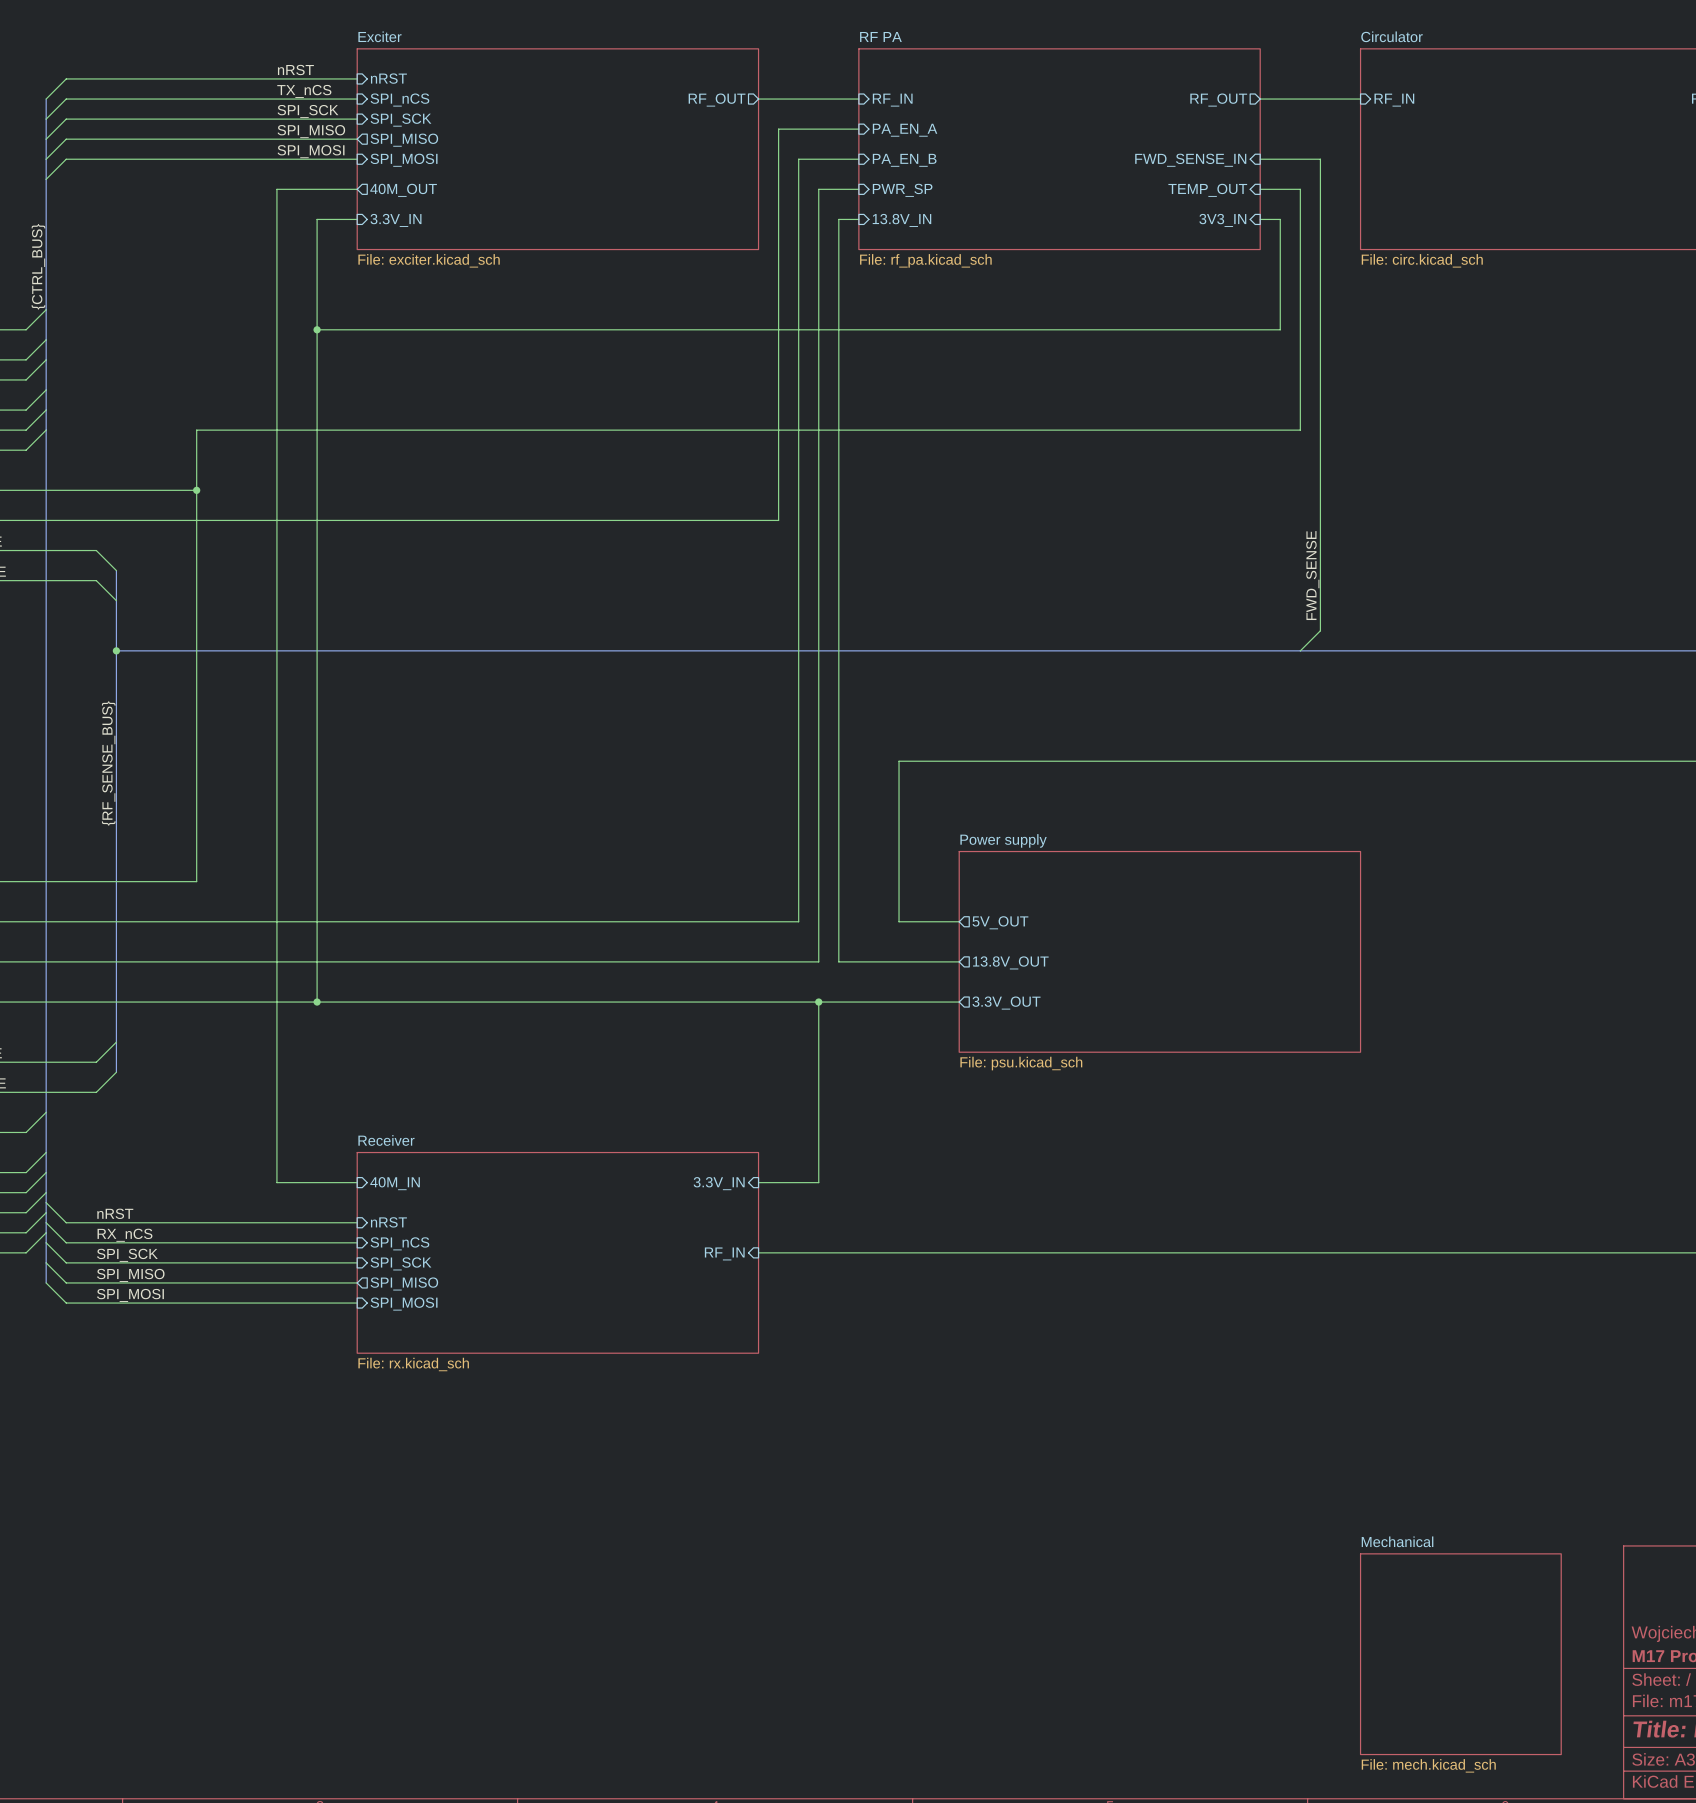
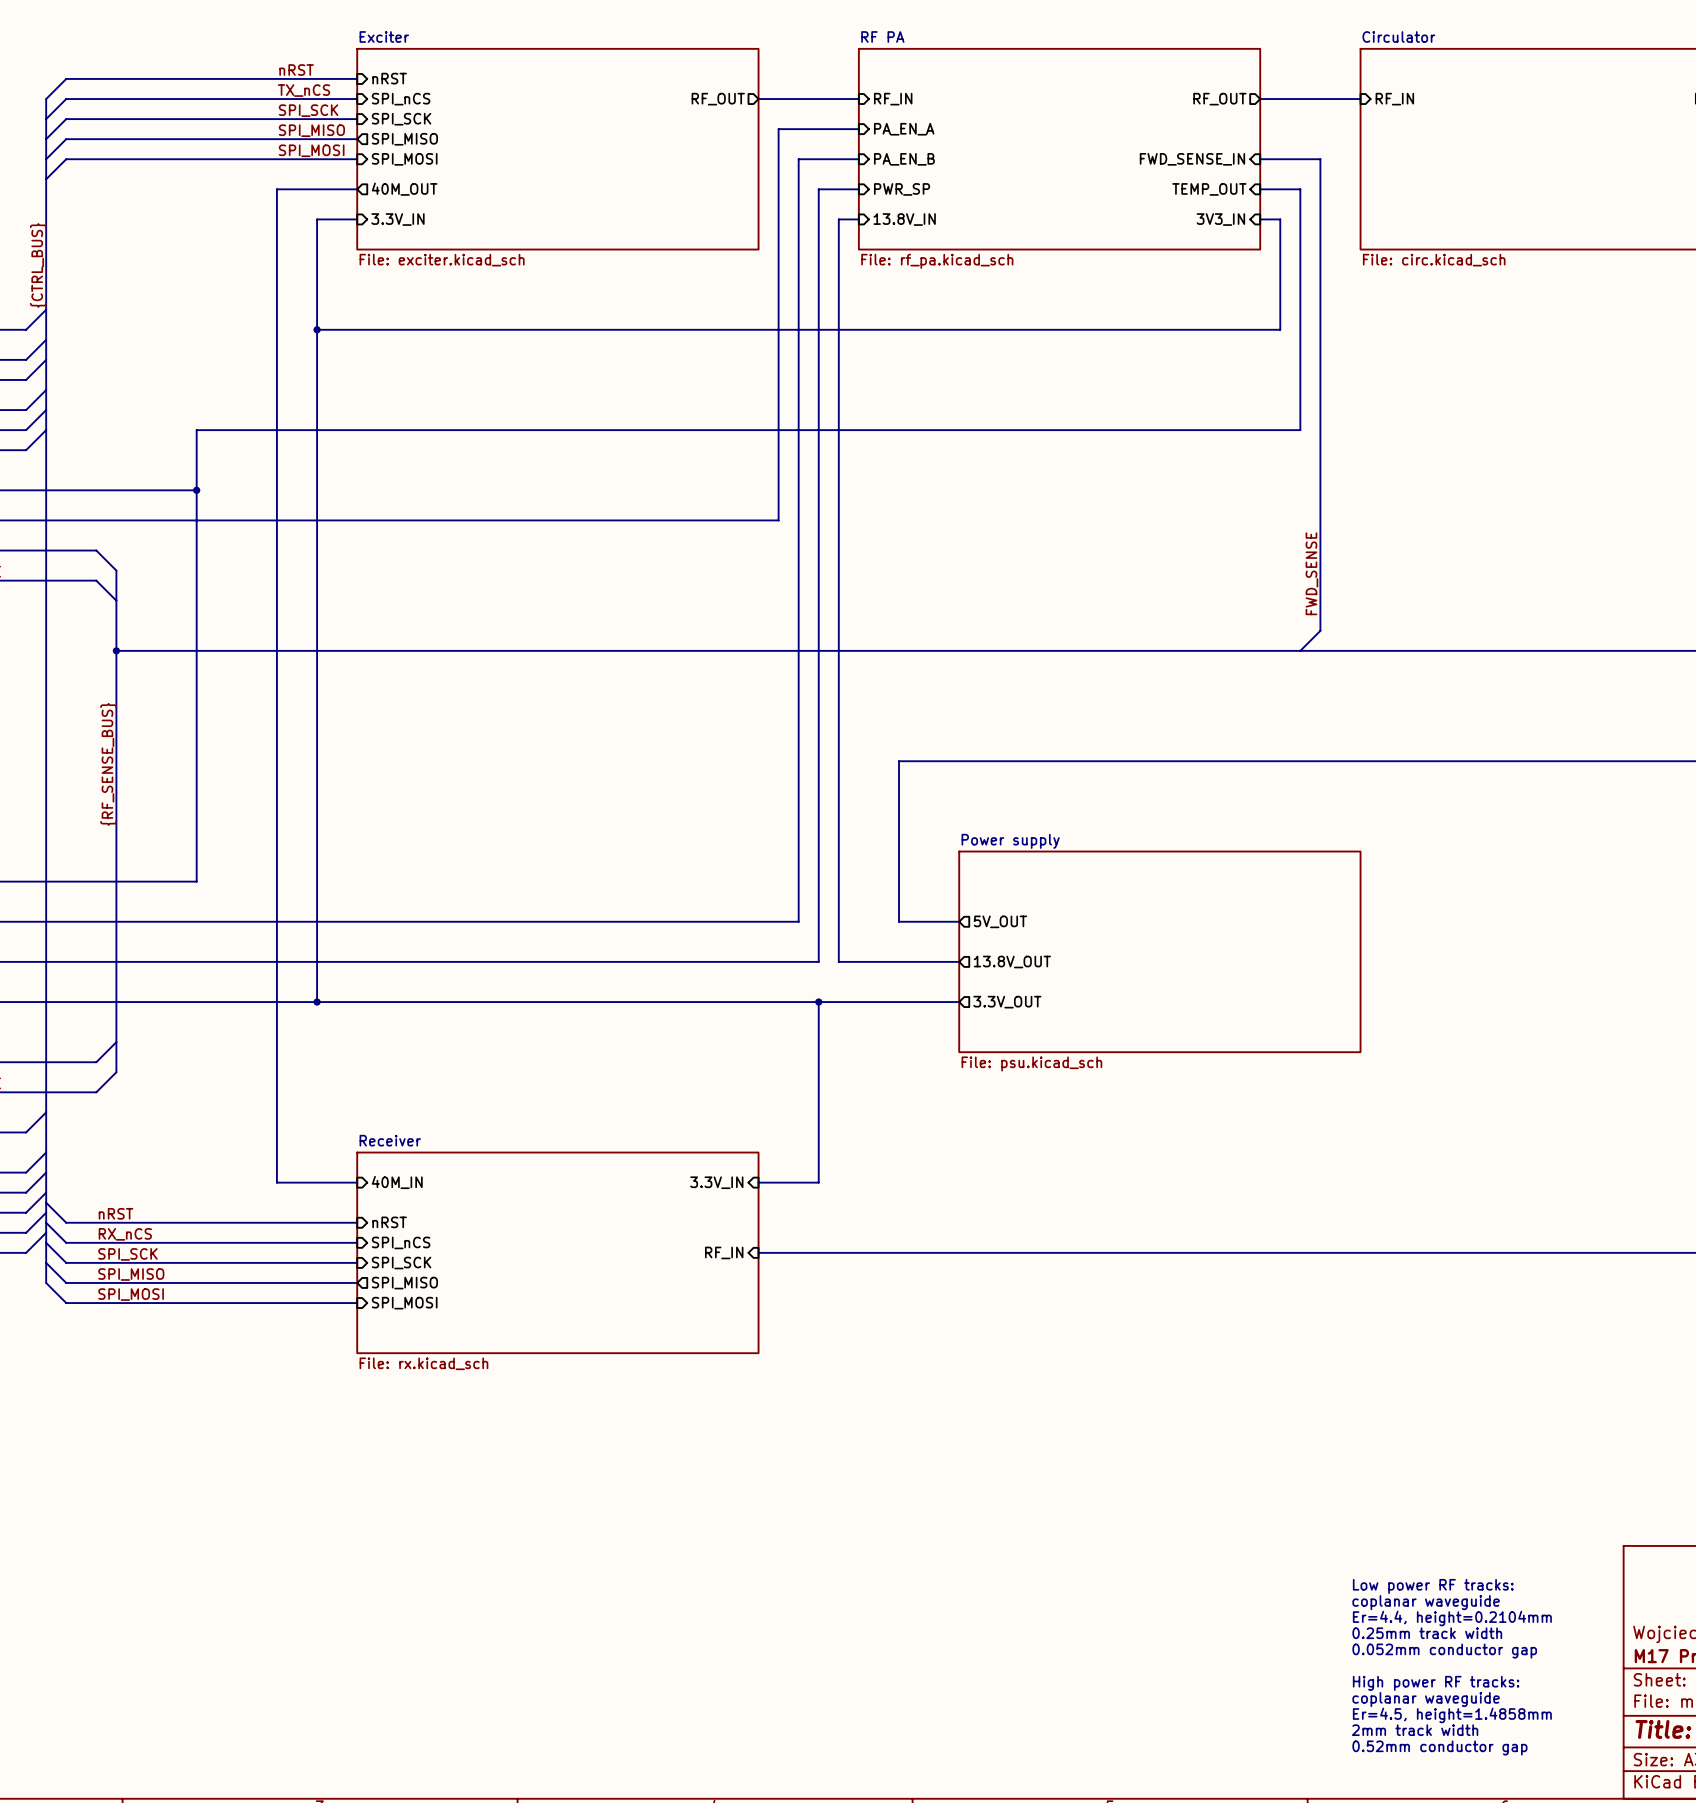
text: none -> Low power RF tracks: (1433, 1586)
text: none -> coplanar waveguide (1426, 1602)
text: none -> Er=4.4, height=0.2104mm (1452, 1618)
text: none -> 0.25mm track width (1427, 1633)
text: none -> 0.052mm conductor gap (1444, 1651)
sheet Mechanical: File: mech.kicad_sch (1460, 1654) -> none
text: none -> High power RF tracks: (1436, 1683)
text: none -> coplanar waveguide (1426, 1699)
text: none -> Er=4.5, height=1.4858mm (1452, 1715)
text: none -> 2mm track width (1415, 1730)
text: none -> 0.52mm conductor gap (1439, 1747)

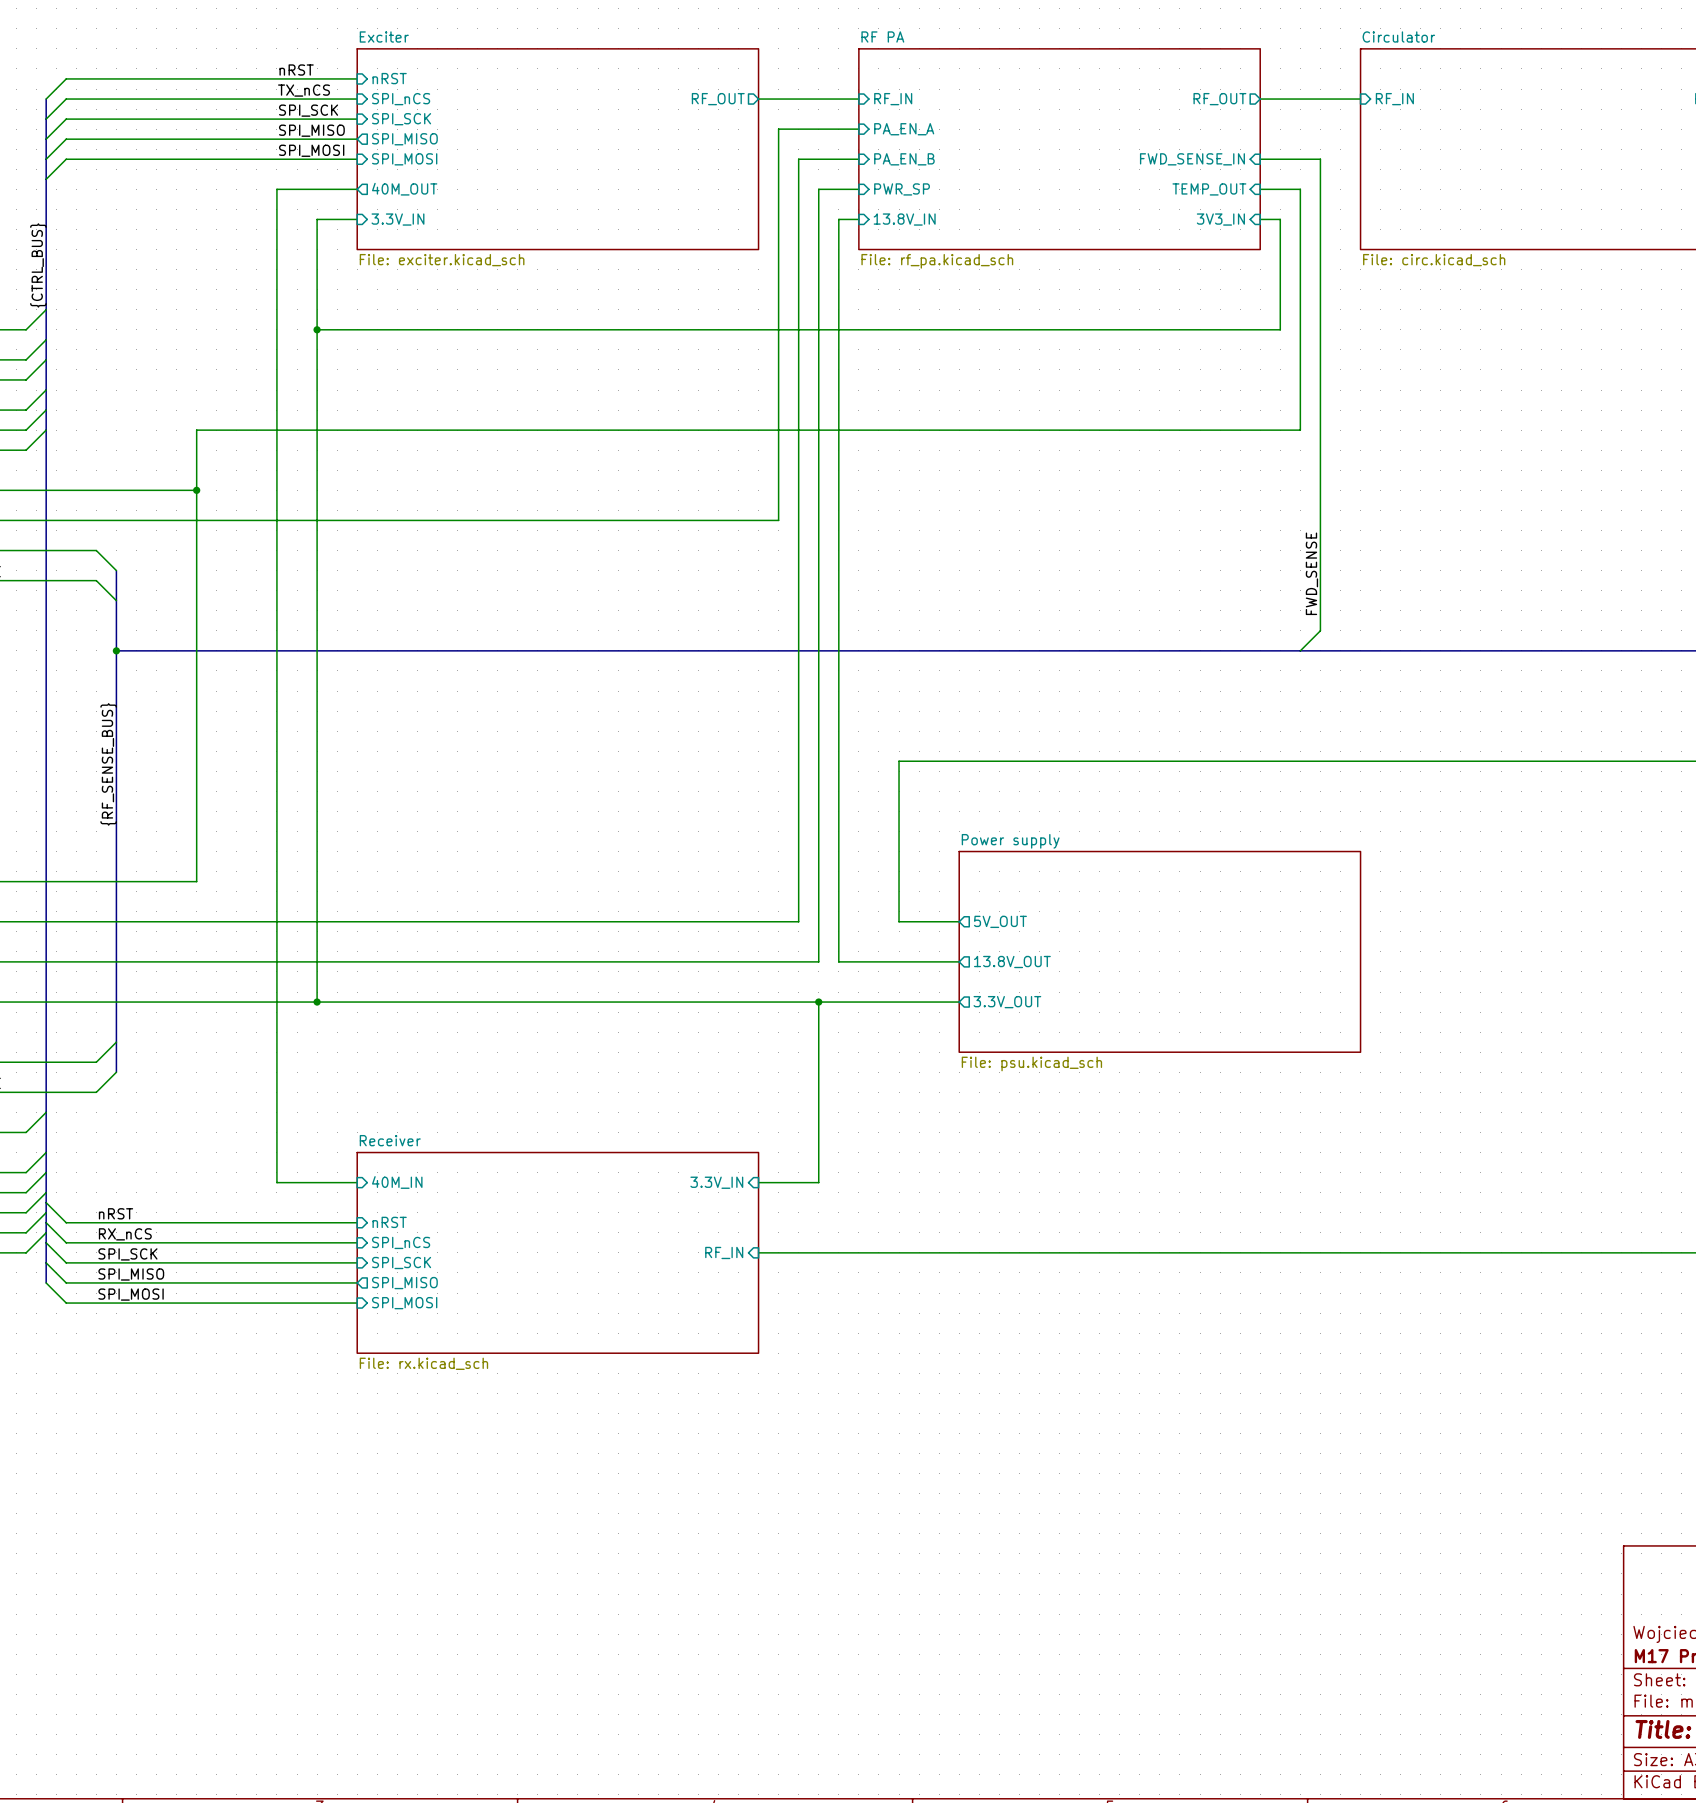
text: Low power RF tracks: (1433, 1586) -> none
text: coplanar waveguide (1426, 1602) -> none
text: Er=4.4, height=0.2104mm (1452, 1618) -> none
text: 0.25mm track width (1427, 1633) -> none
text: 0.052mm conductor gap (1444, 1651) -> none
text: High power RF tracks: (1436, 1683) -> none
text: coplanar waveguide (1426, 1699) -> none
text: Er=4.5, height=1.4858mm (1452, 1715) -> none
text: 2mm track width (1415, 1730) -> none
text: 0.52mm conductor gap (1439, 1747) -> none

